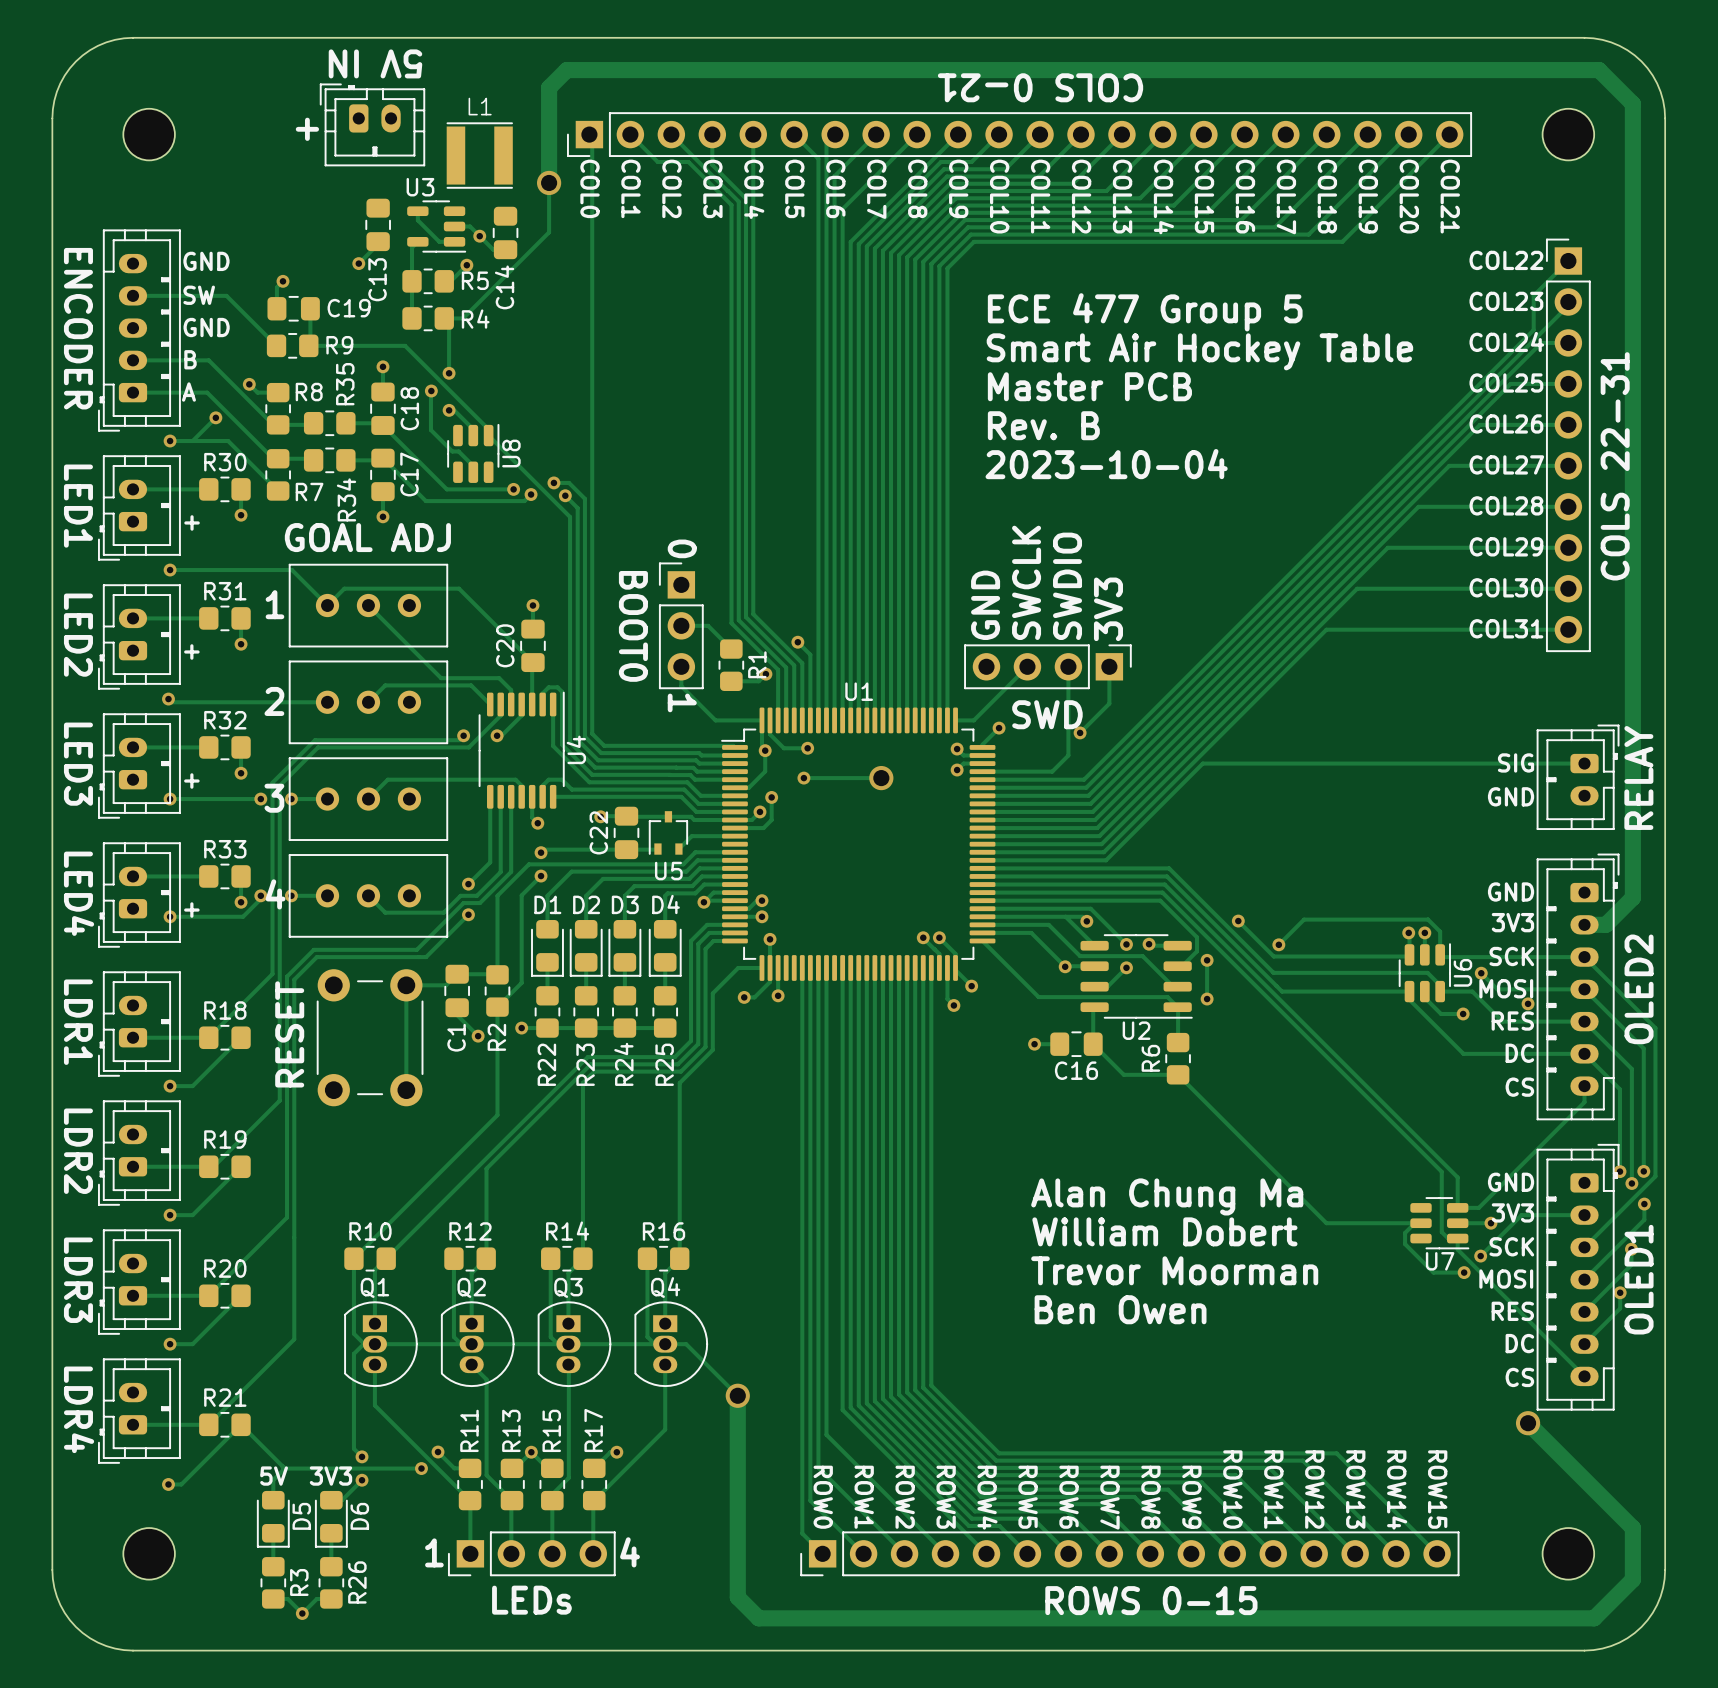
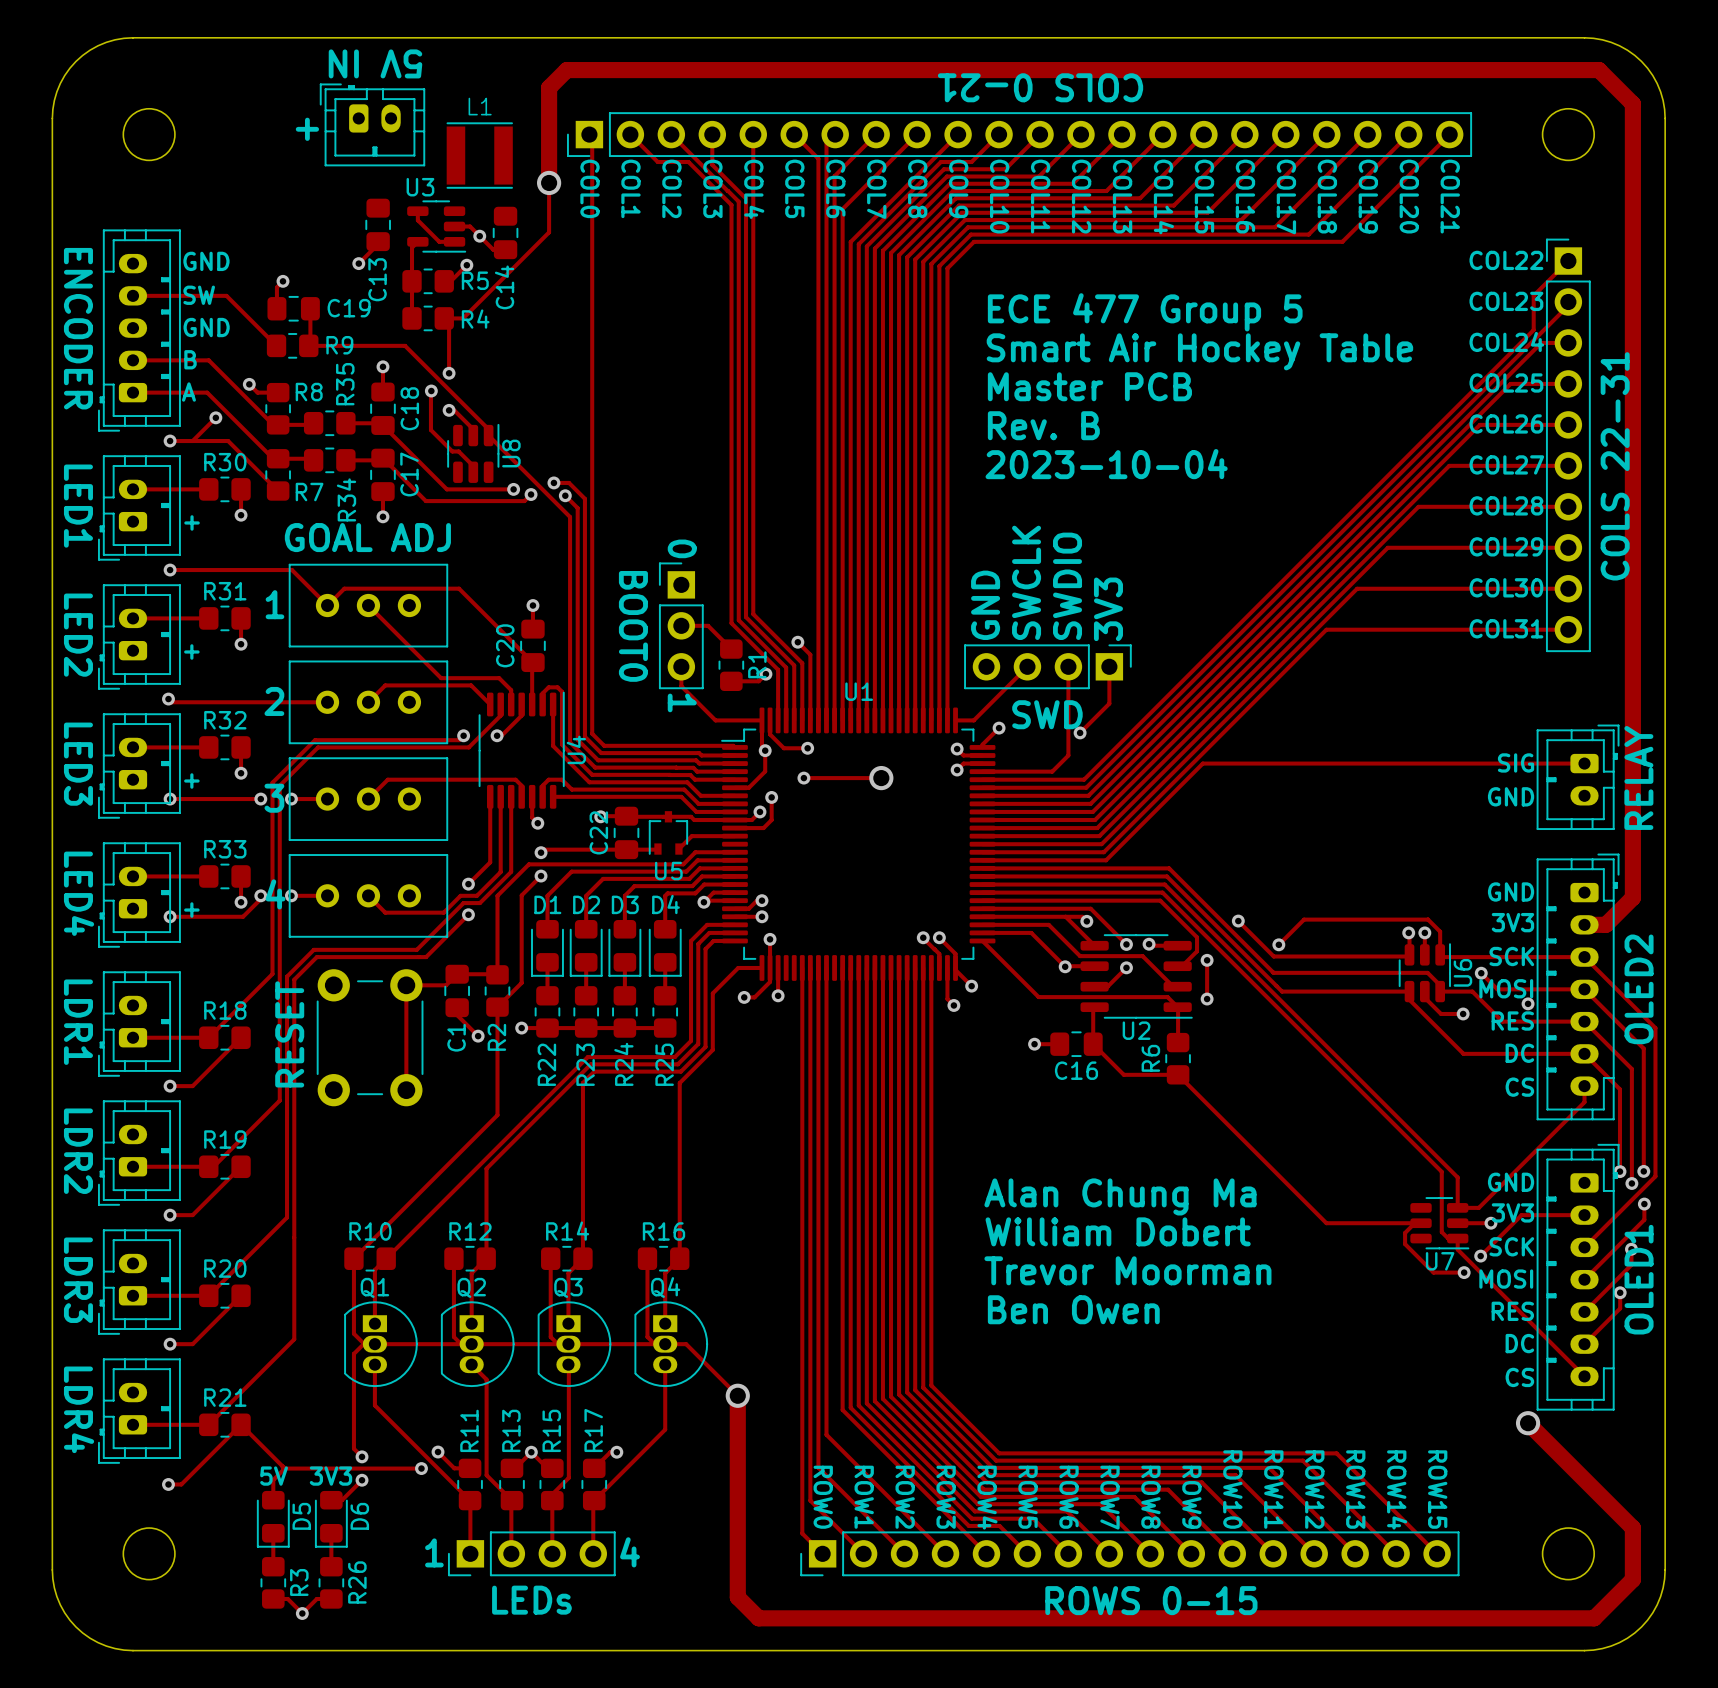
text position: Alan Chung Ma (1167, 1196) -> Alan Chung Ma (1120, 1196)
text position: William Dobert (1164, 1231) -> William Dobert (1118, 1231)
text position: Trevor Moorman (1174, 1270) -> Trevor Moorman (1127, 1270)
text position: Ben Owen (1120, 1309) -> Ben Owen (1073, 1309)

